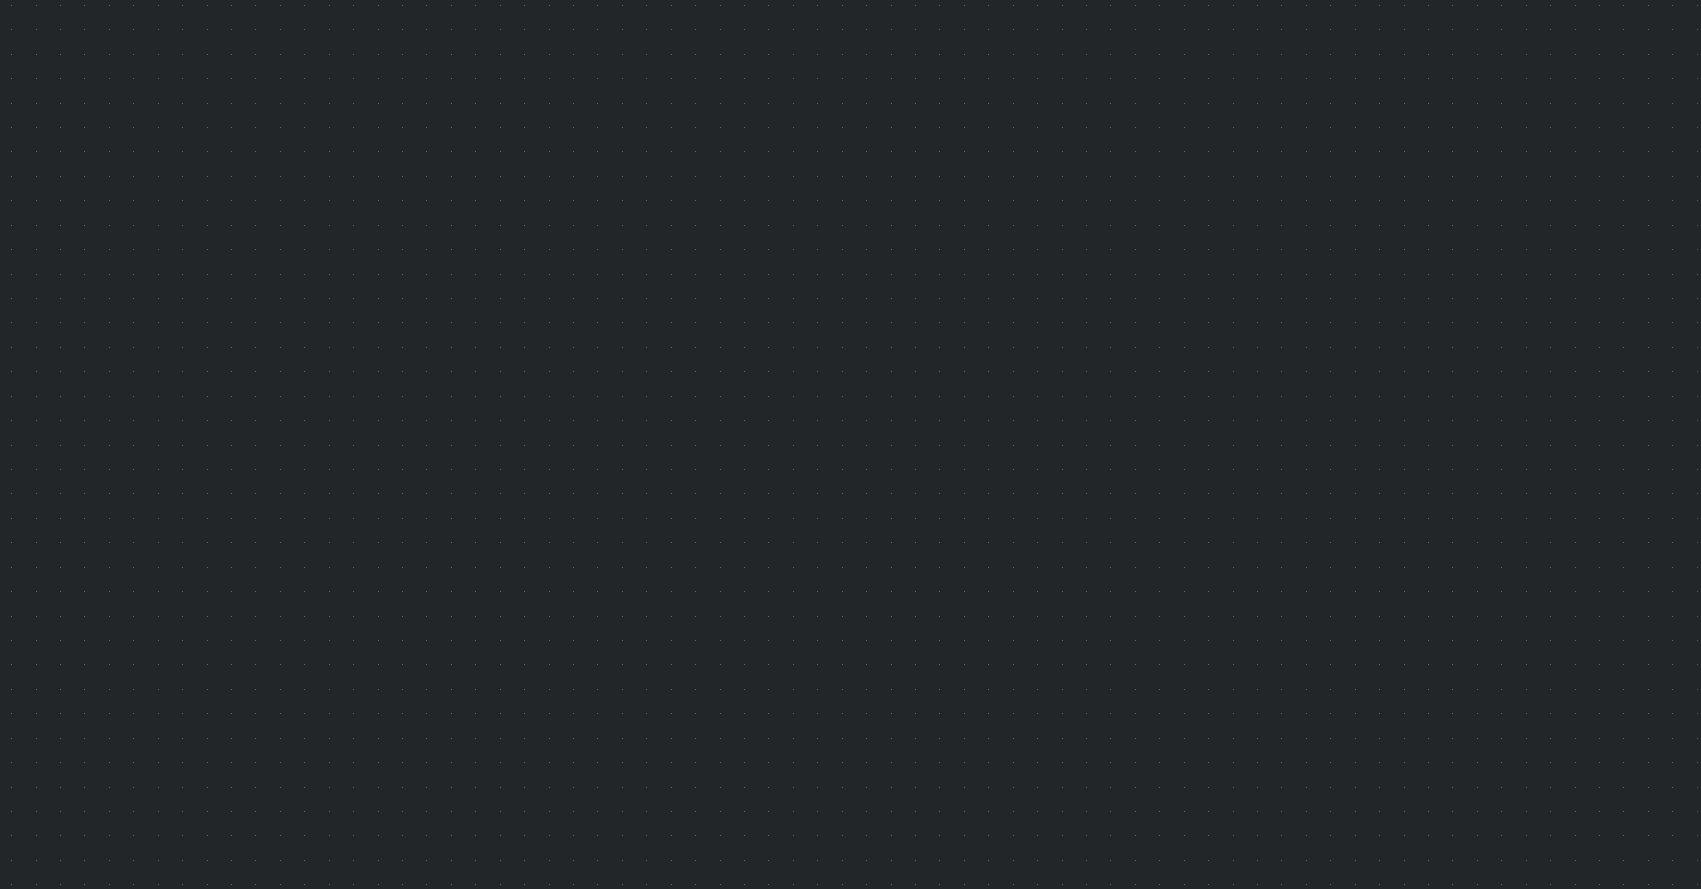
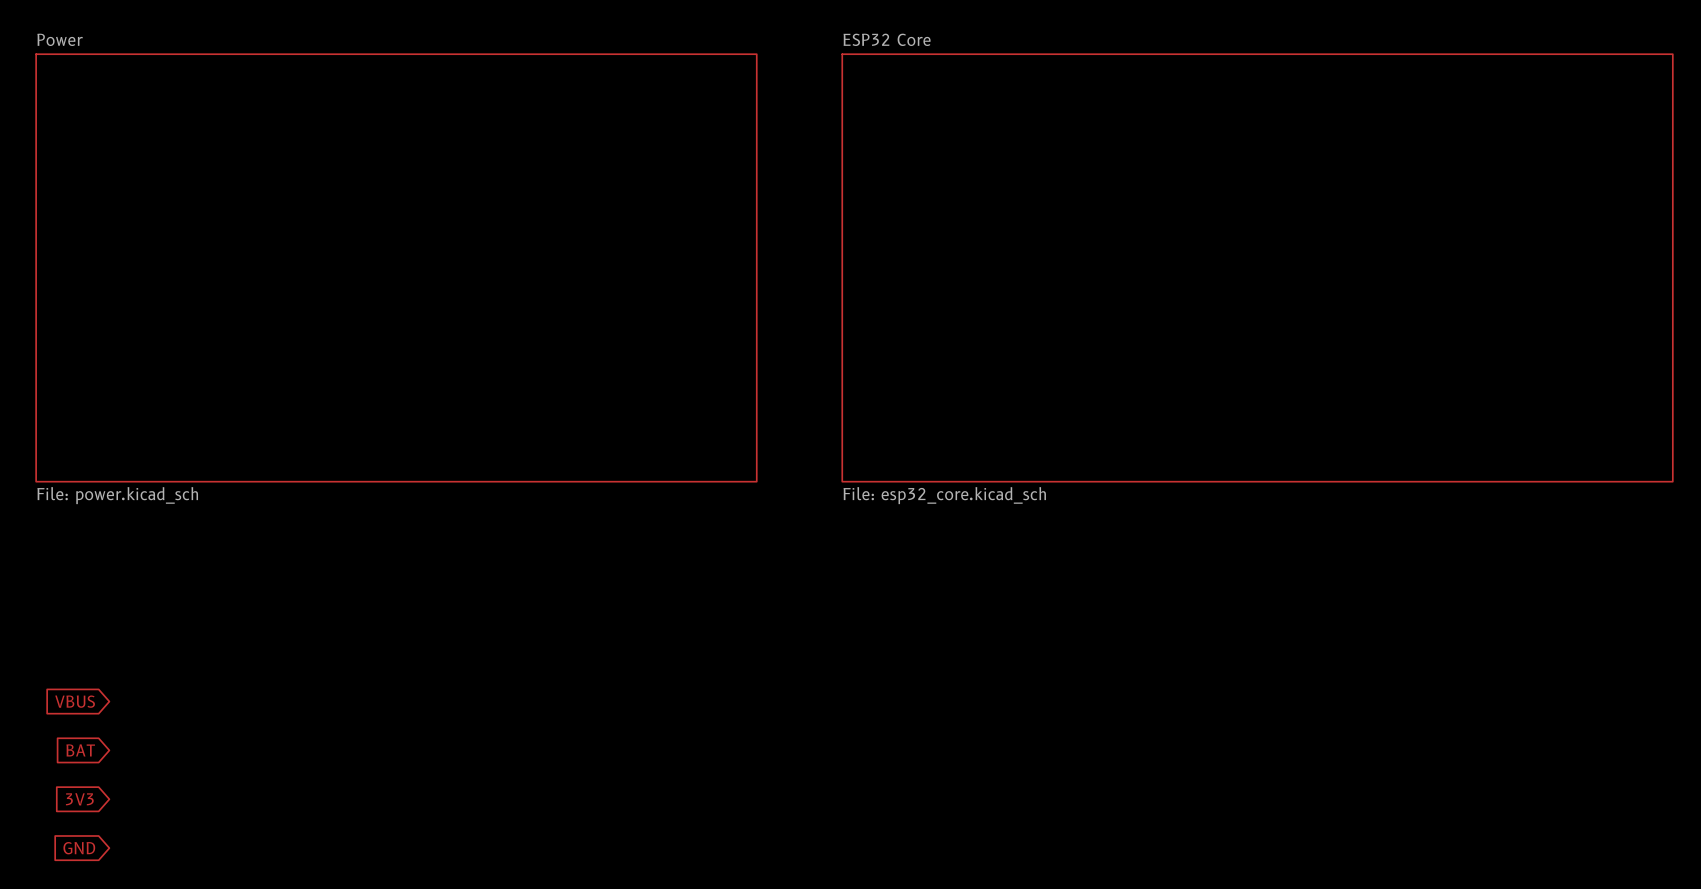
sheet Power: none -> File: power.kicad_sch (396, 267)
sheet ESP32 Core: none -> File: esp32_core.kicad_sch (1257, 267)
global label: none -> VBUS (75, 701)
global label: none -> BAT (80, 750)
global label: none -> 3V3 (79, 799)
global label: none -> GND (79, 848)

